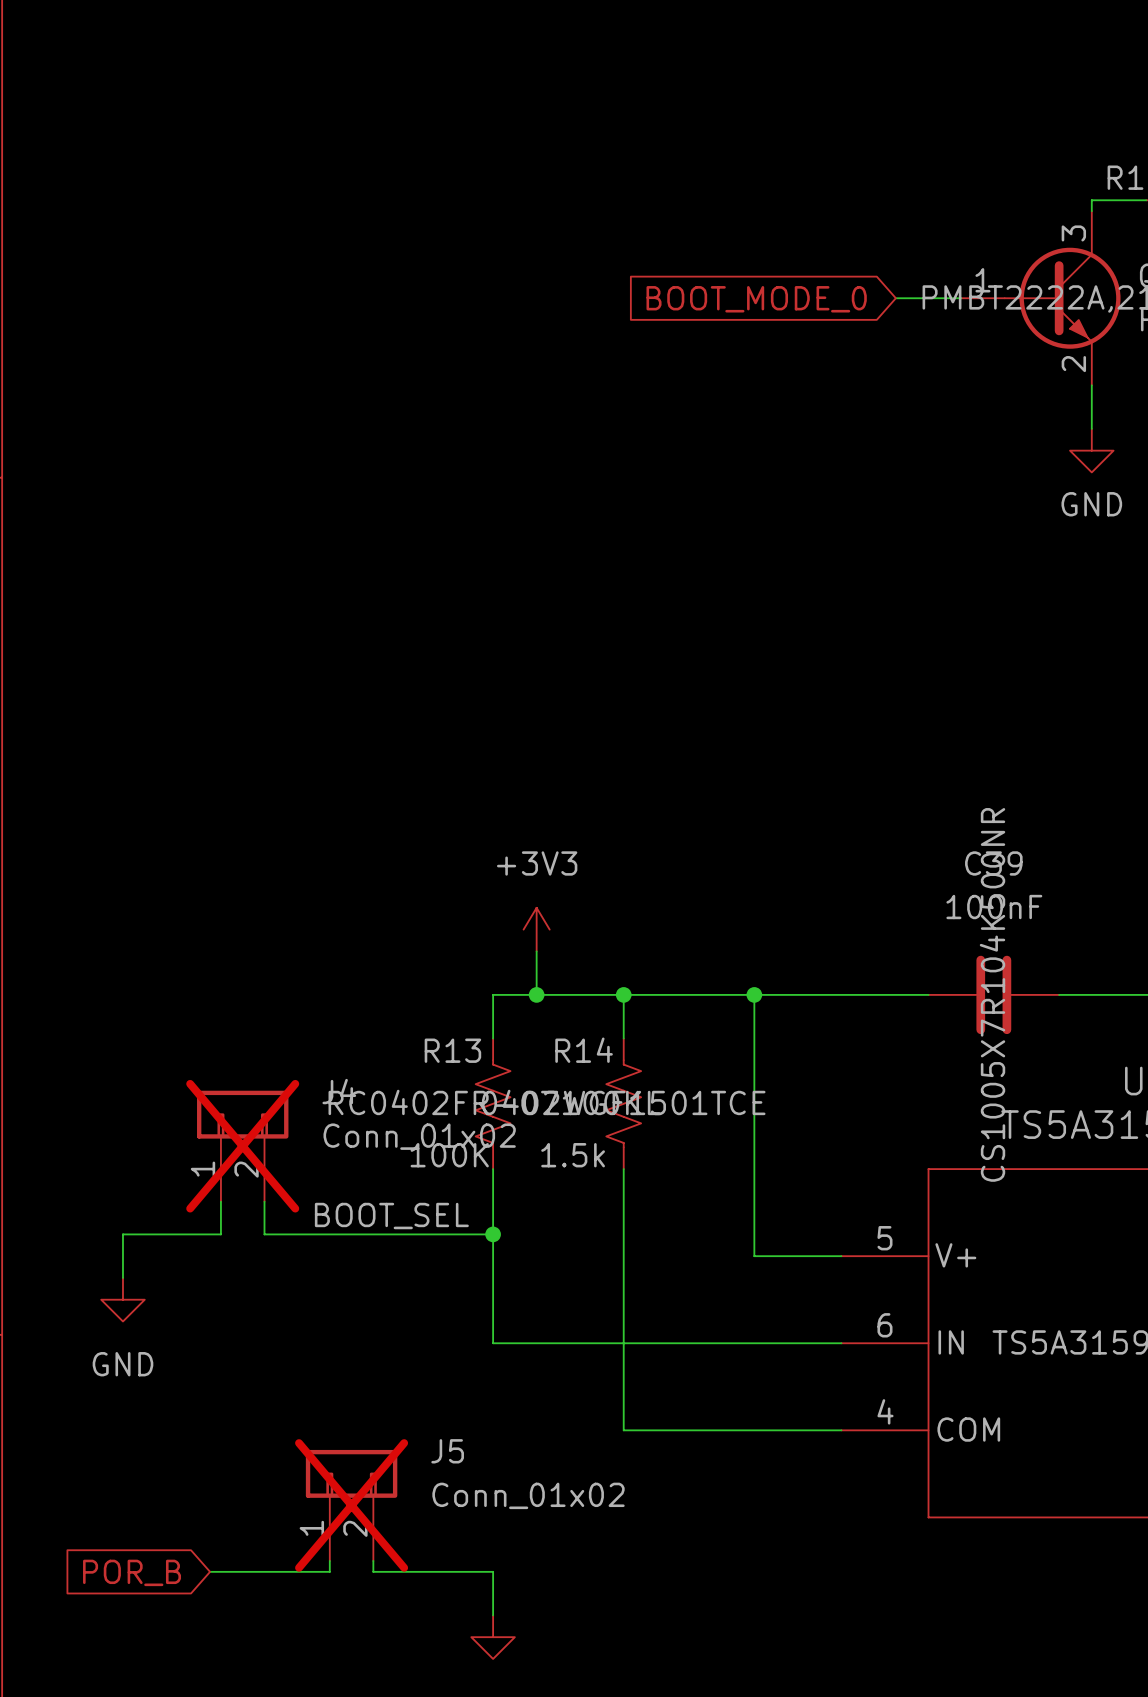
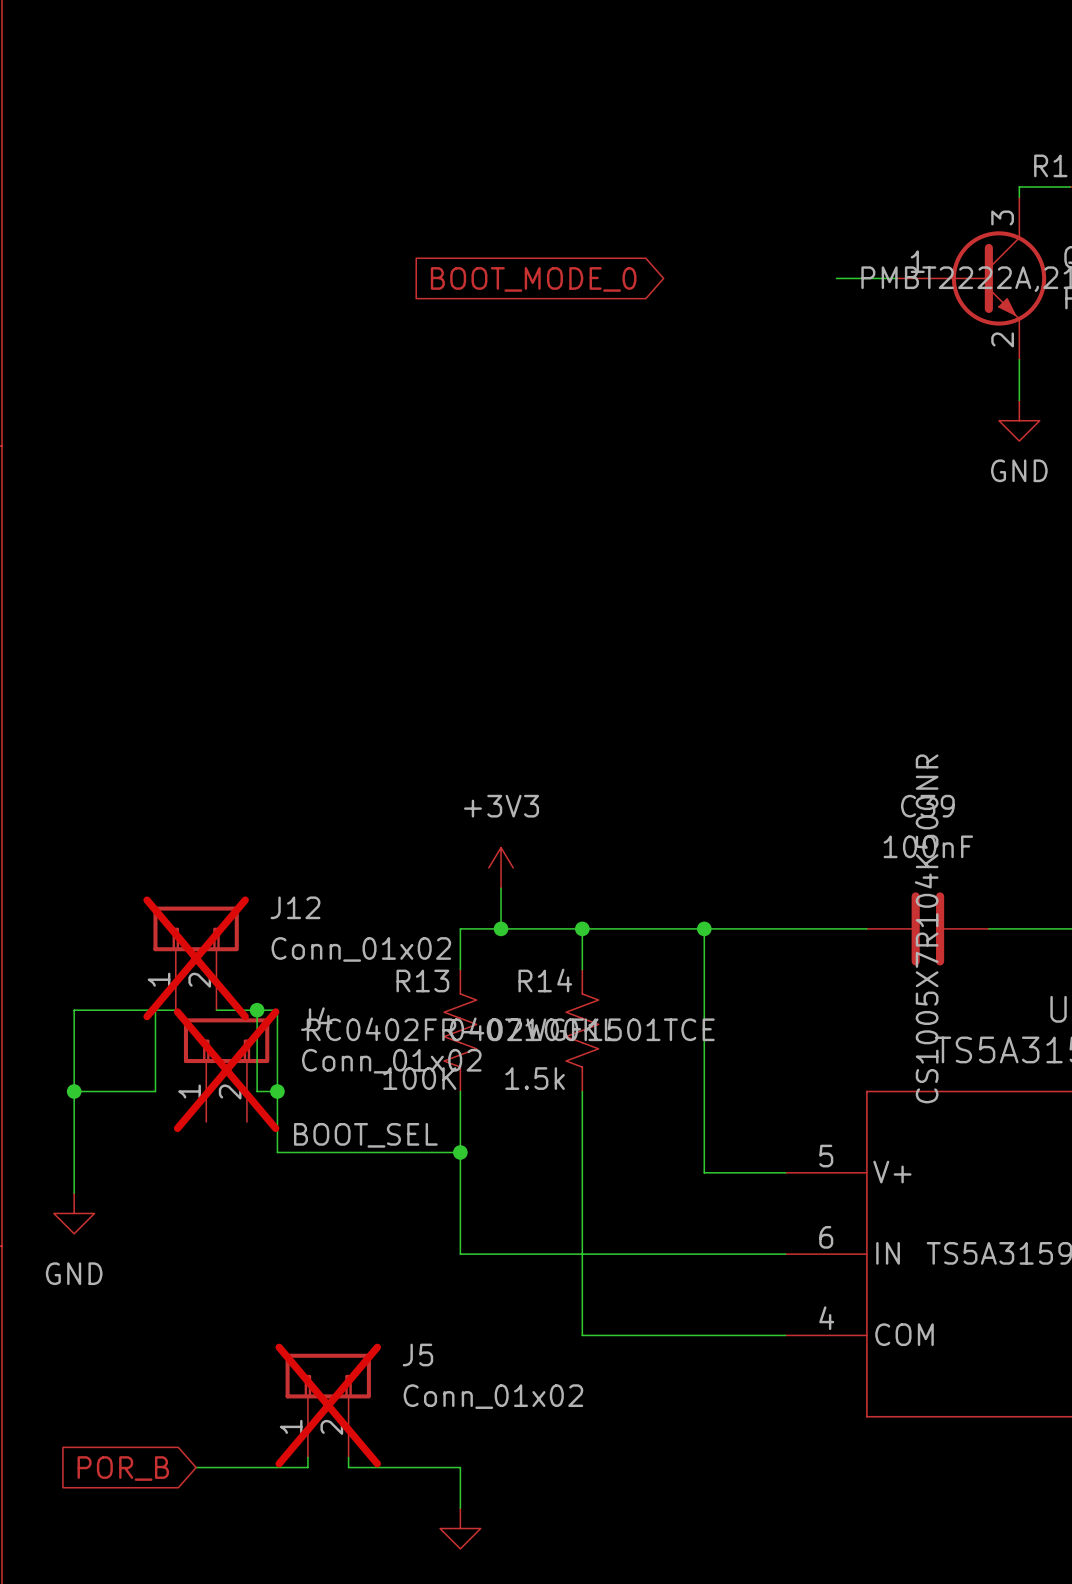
global label position: BOOT_MODE_0 (756, 299) -> BOOT_MODE_0 (533, 279)
J12: none -> Conn_01x02 (196, 958)
wire: none -> (155, 1010) (155, 1091) (74, 1091)
wire: none -> (175, 1010) (74, 1010) (74, 1193)
wire: none -> (257, 1010) (257, 1091) (277, 1091)
junction: none -> (257, 1010)
junction: none -> (74, 1091)
junction: none -> (277, 1091)
wire: (220, 1201) (220, 1234) (122, 1234) (122, 1277) -> none
wire: (264, 1201) (264, 1234) (297, 1234) -> (216, 1010) (277, 1010) (277, 1152)
power symbol position: GND (122, 1299) -> GND (74, 1213)

